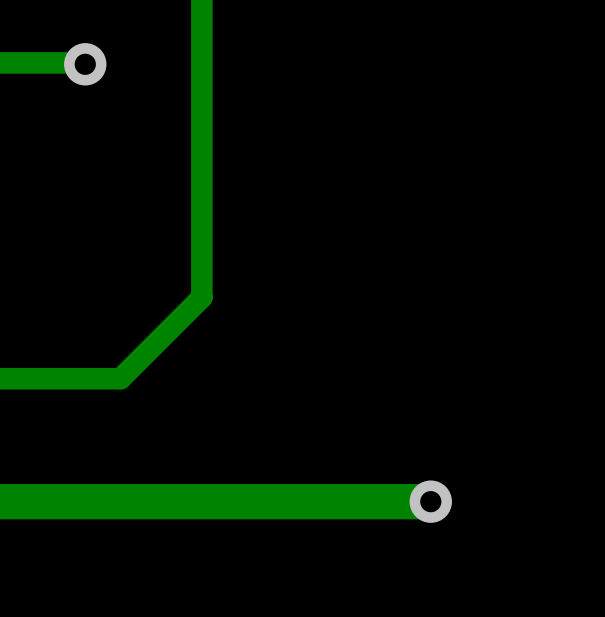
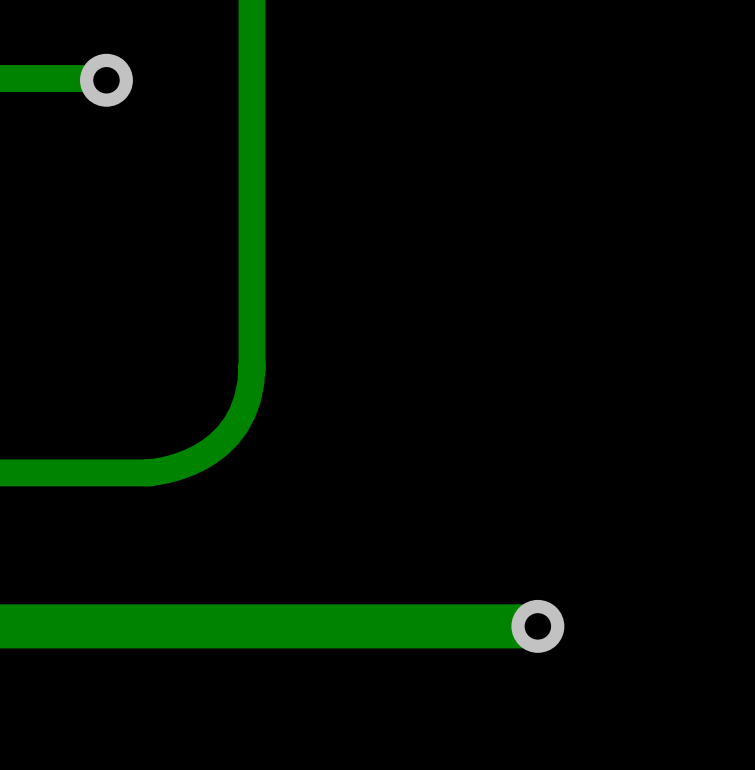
track: none -> (252, 364) (247, 398) (242, 413) (227, 435) (209, 451) (189, 462) (171, 468) (147, 472)
track: (201, 297) (120, 378) -> none

